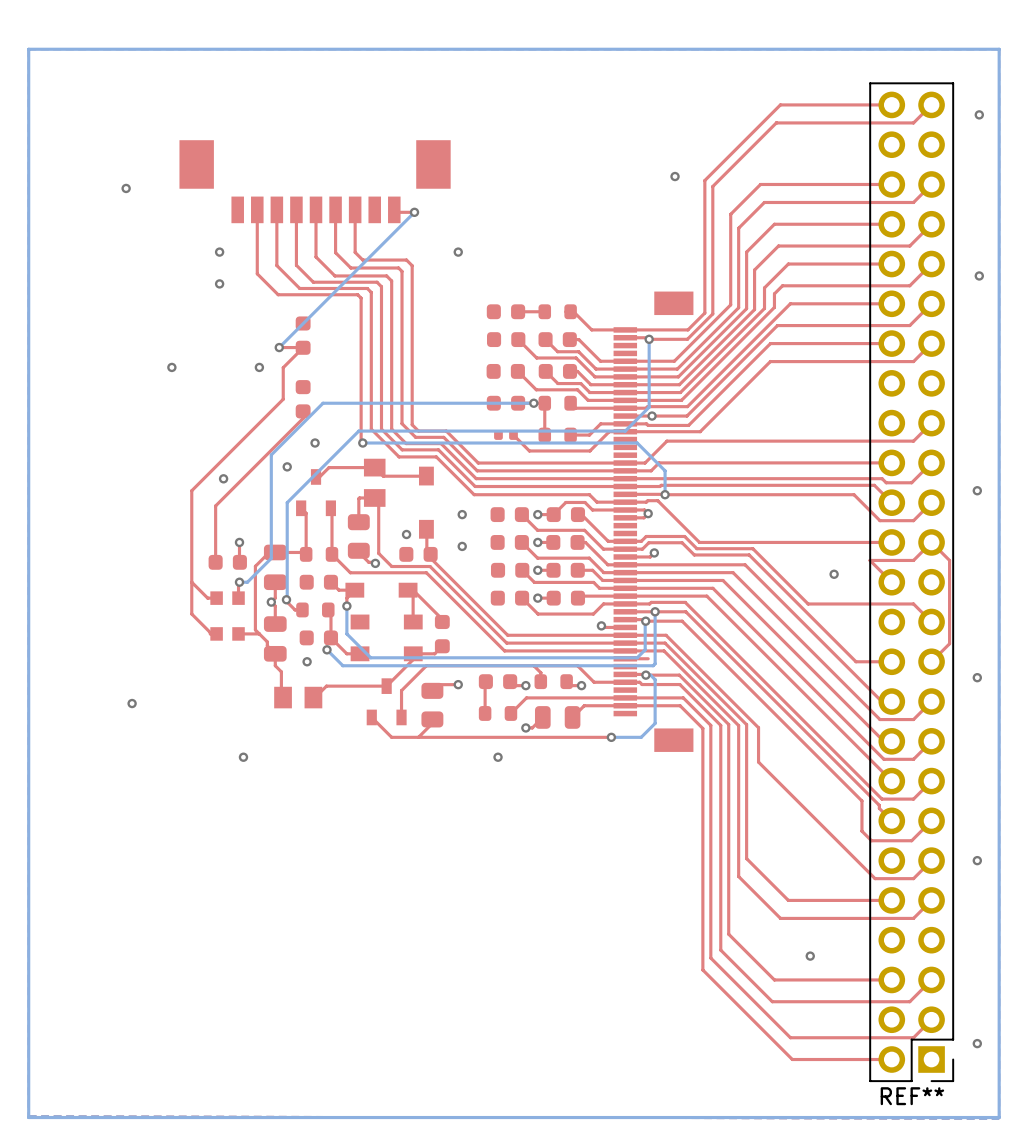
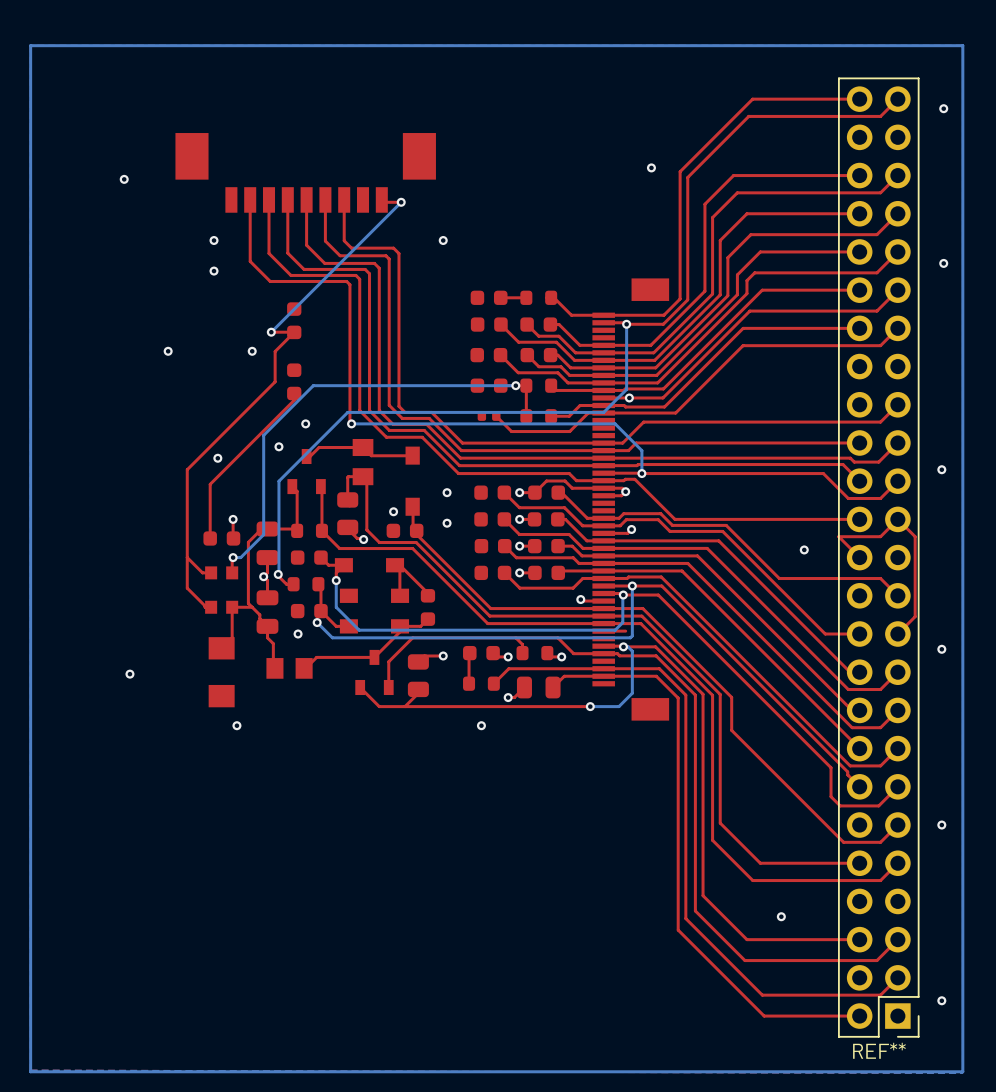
top track: none -> (232, 607) (232, 637) (221, 648)
part: none -> (221, 672)

